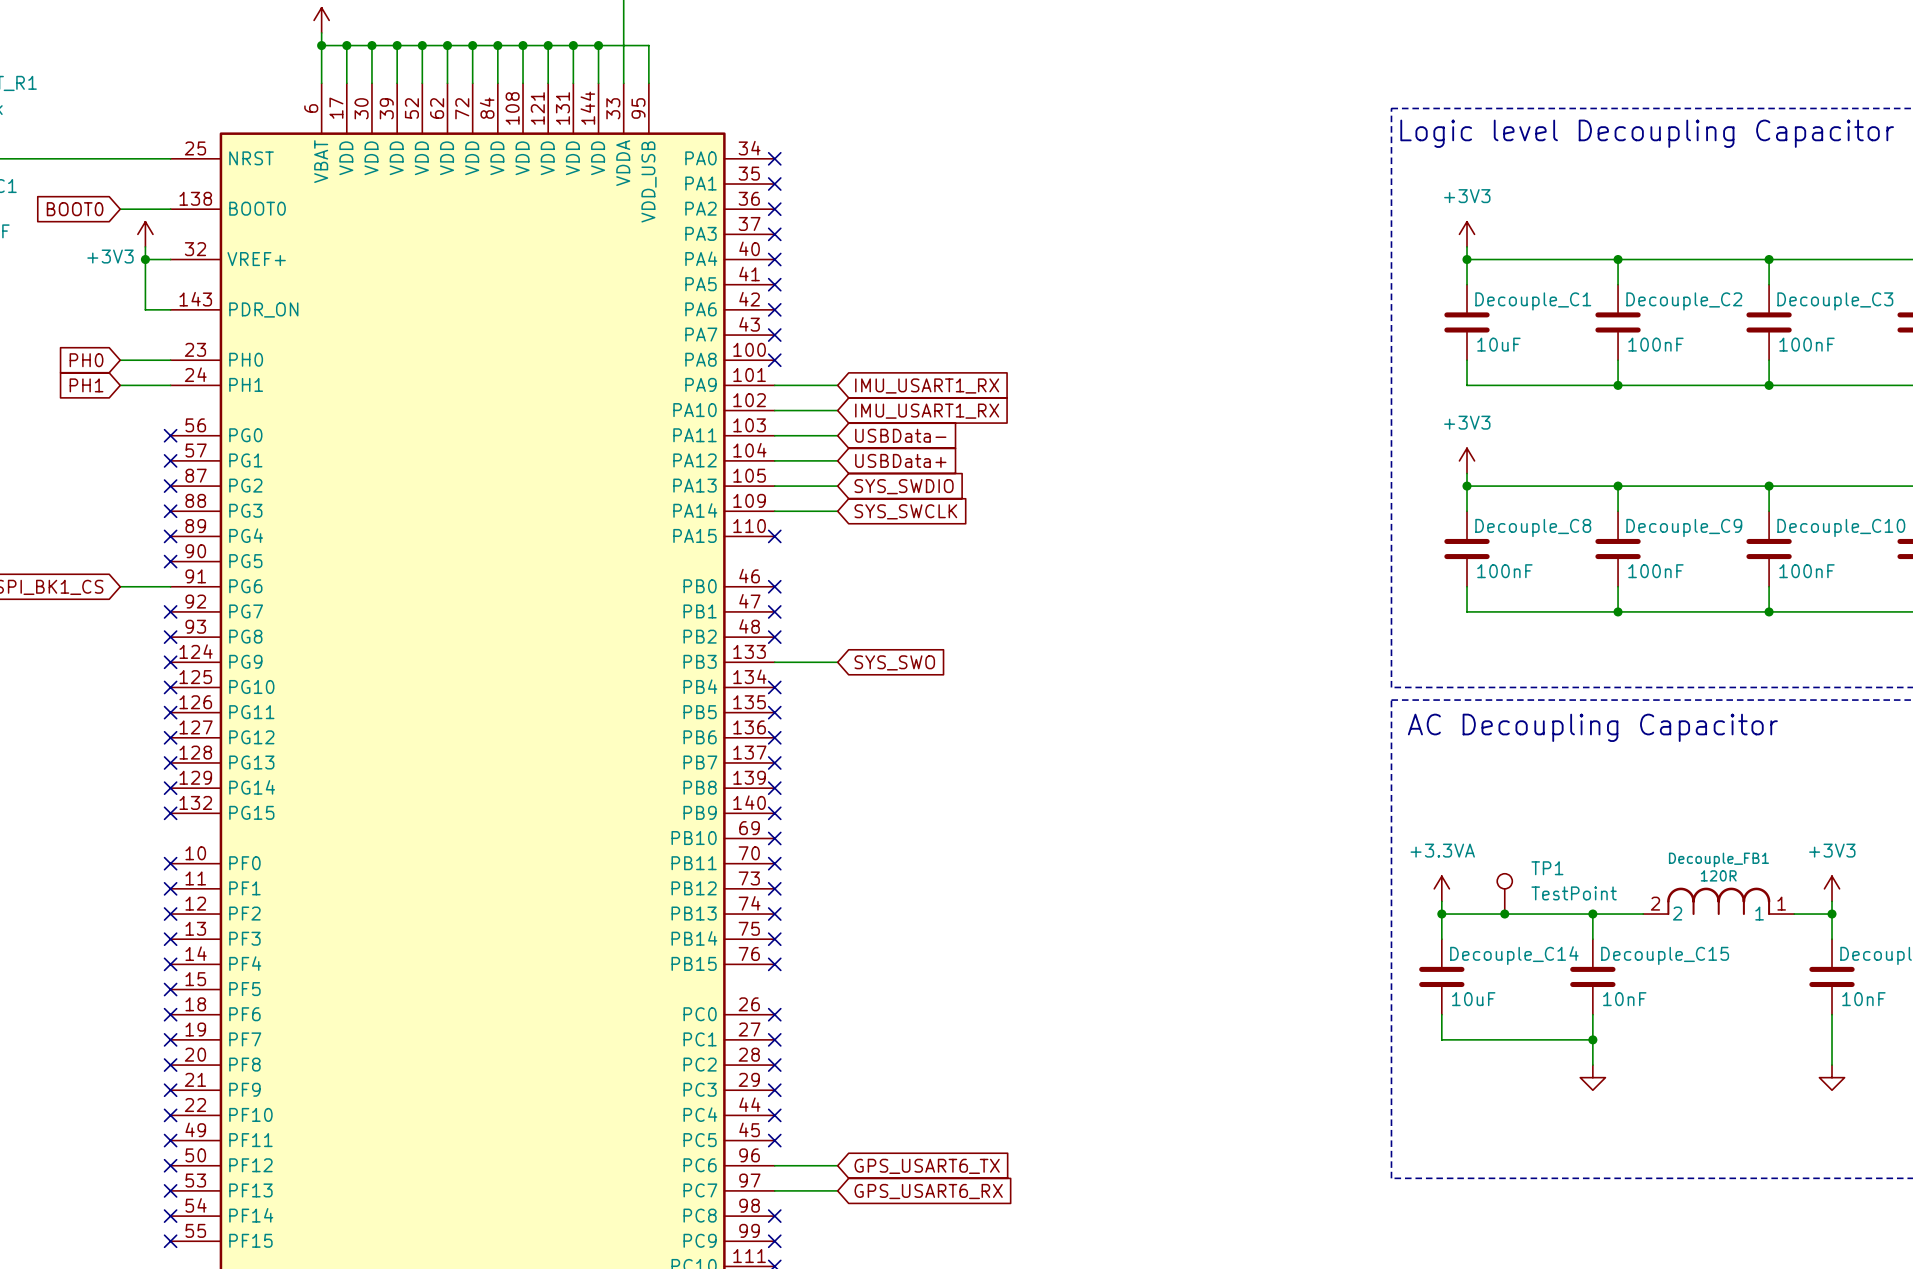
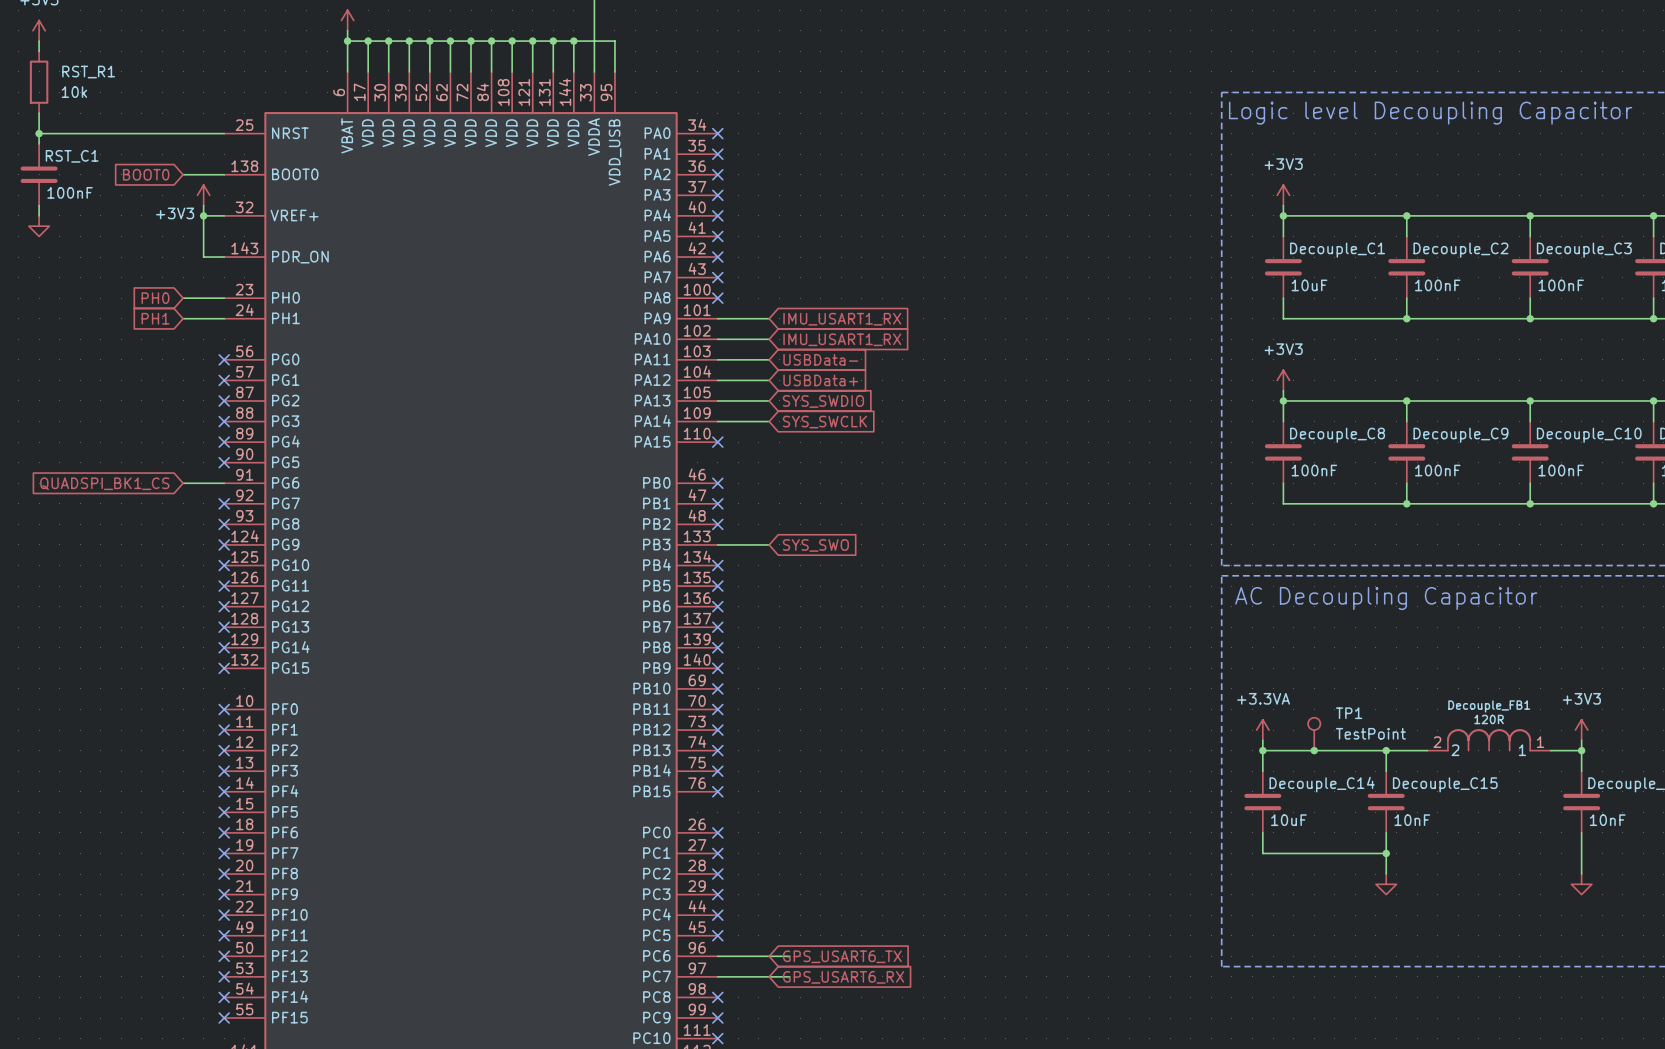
wire: none -> (769, 956) (789, 956)
wire: none -> (769, 976) (789, 976)

